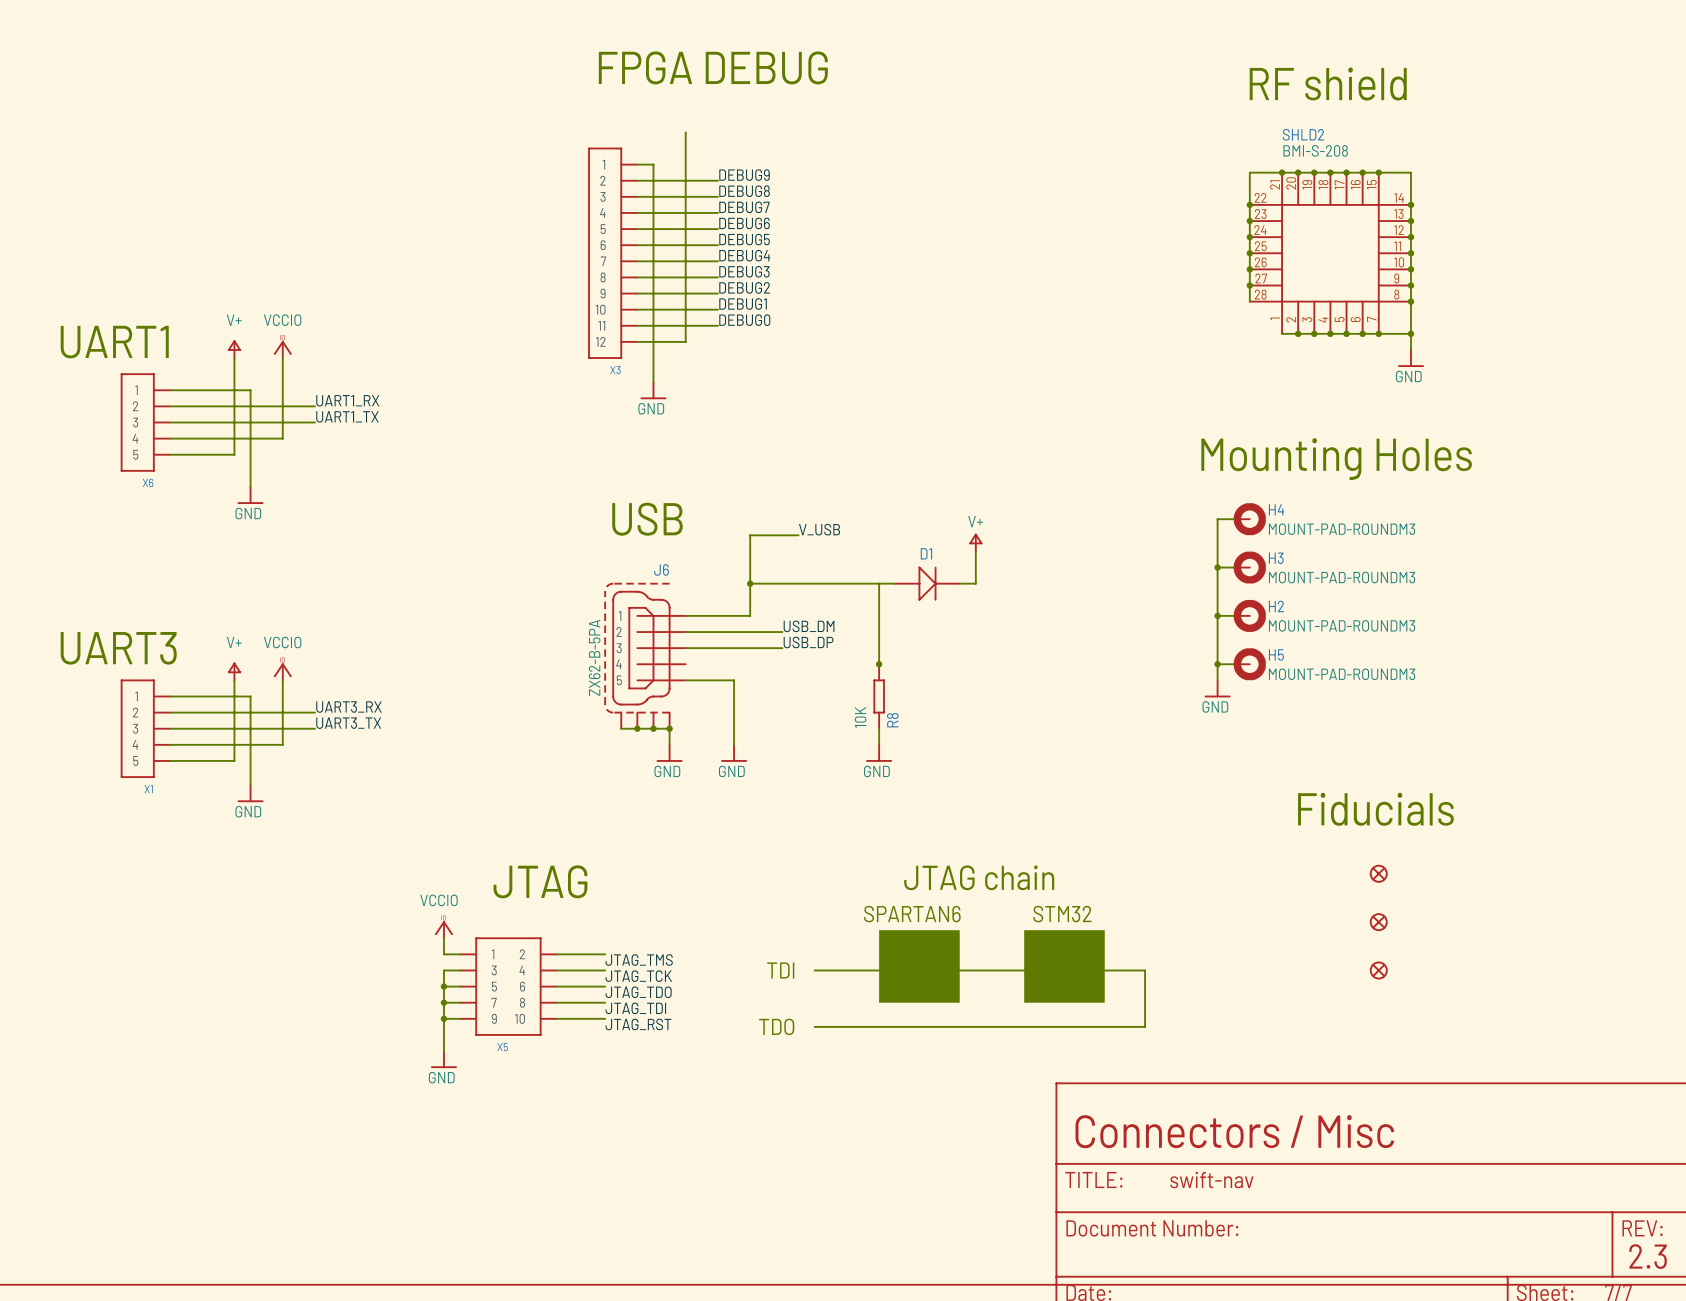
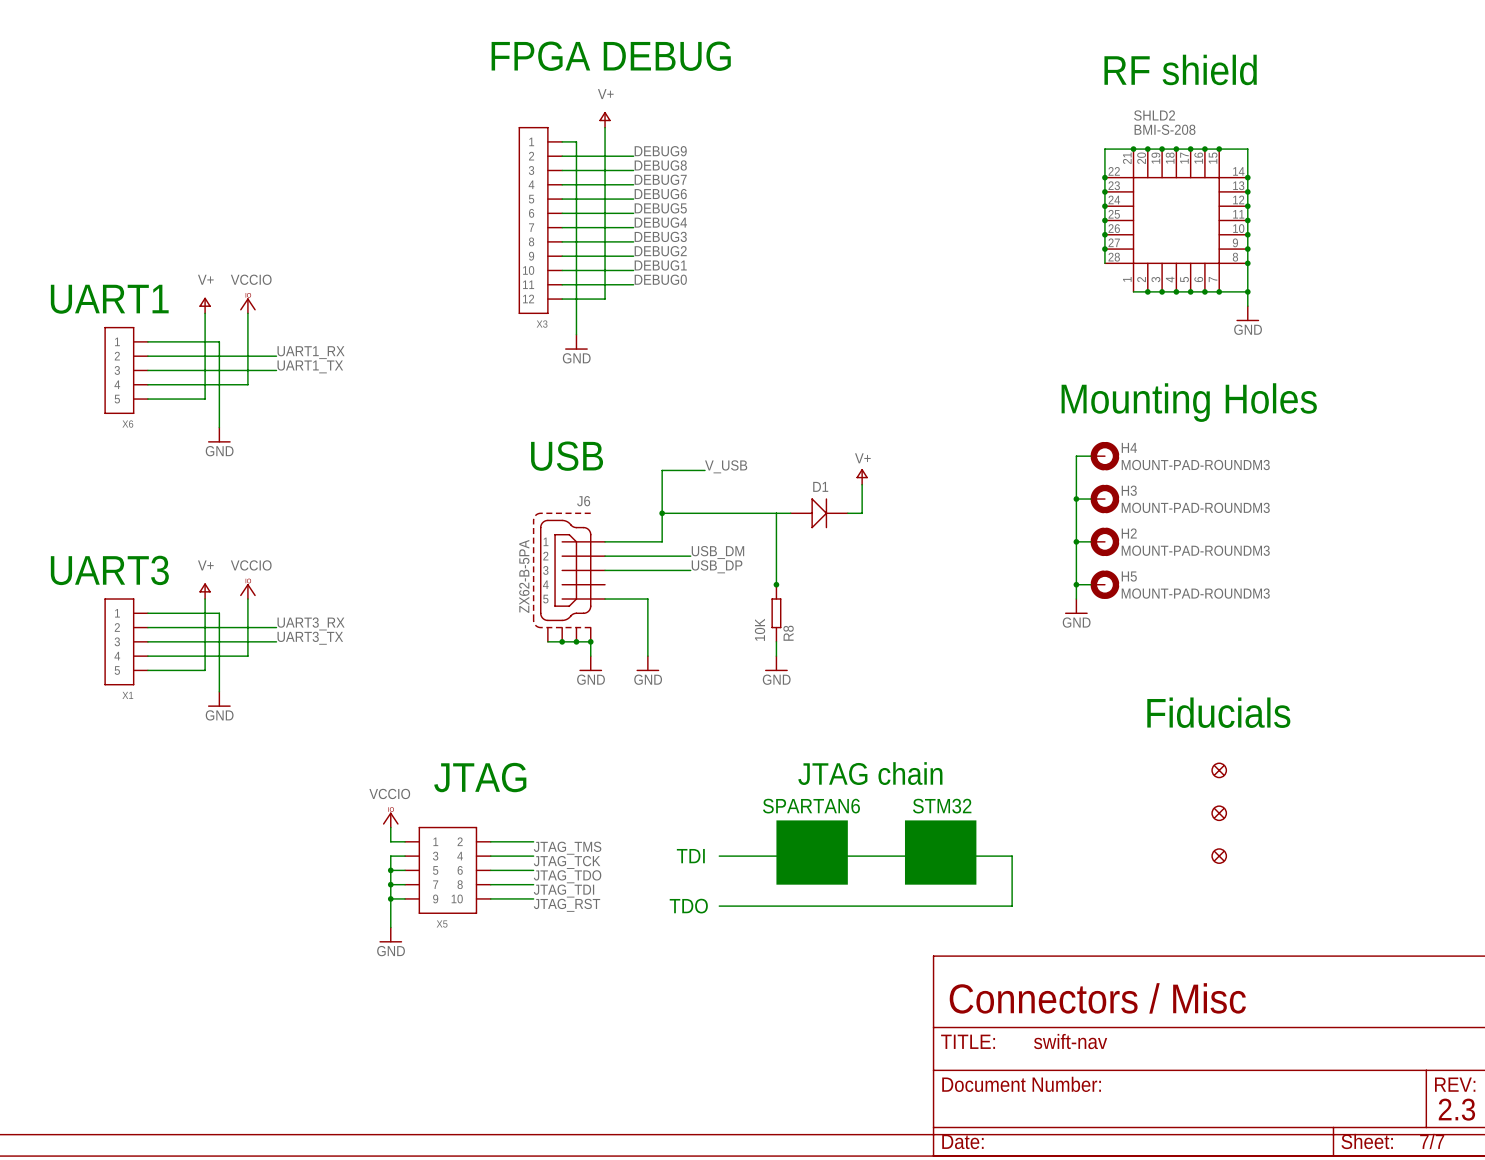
power symbol: none -> V+ (605, 119)

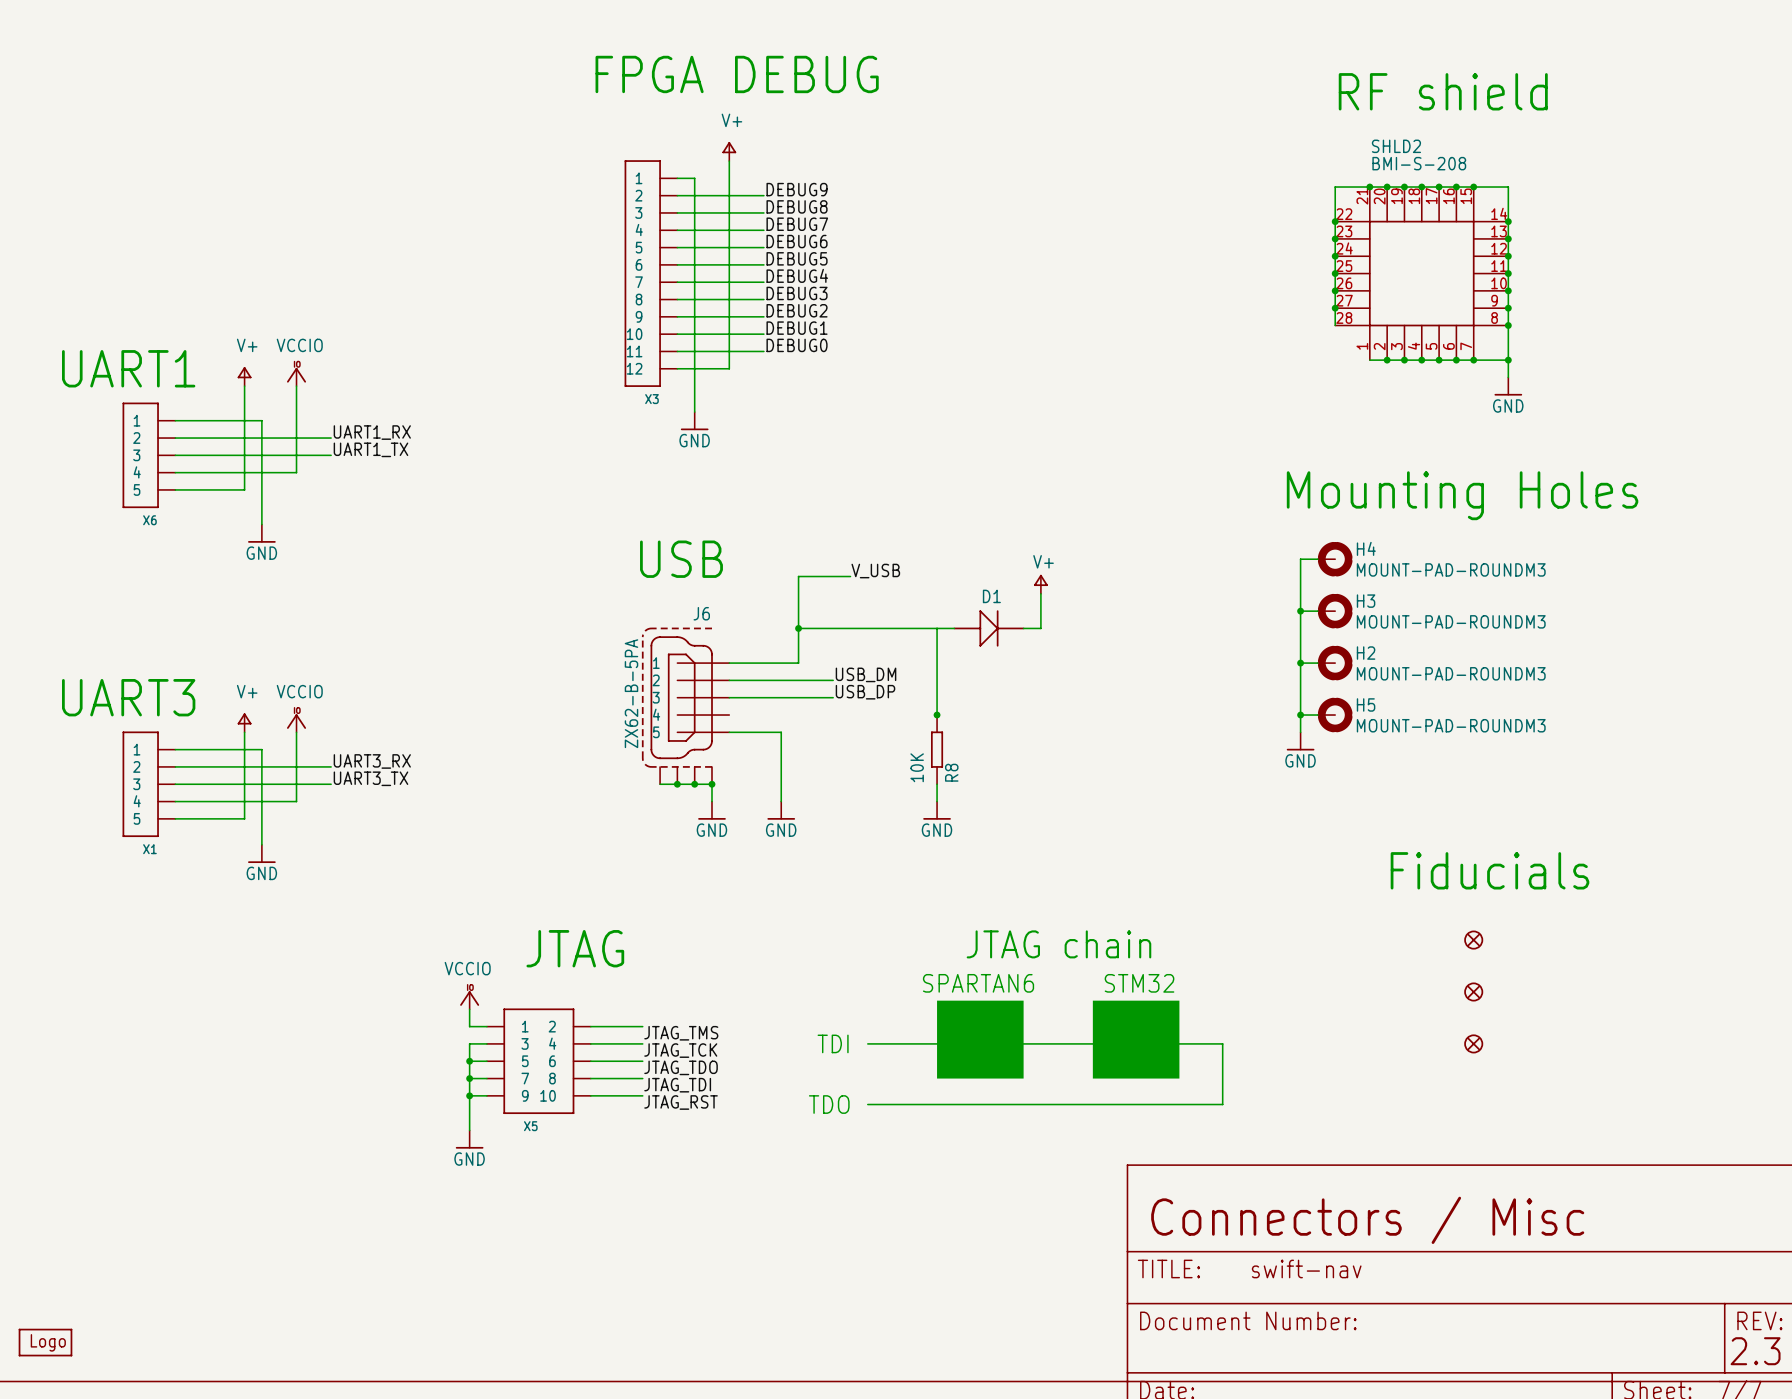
part: none -> (45, 1342)

